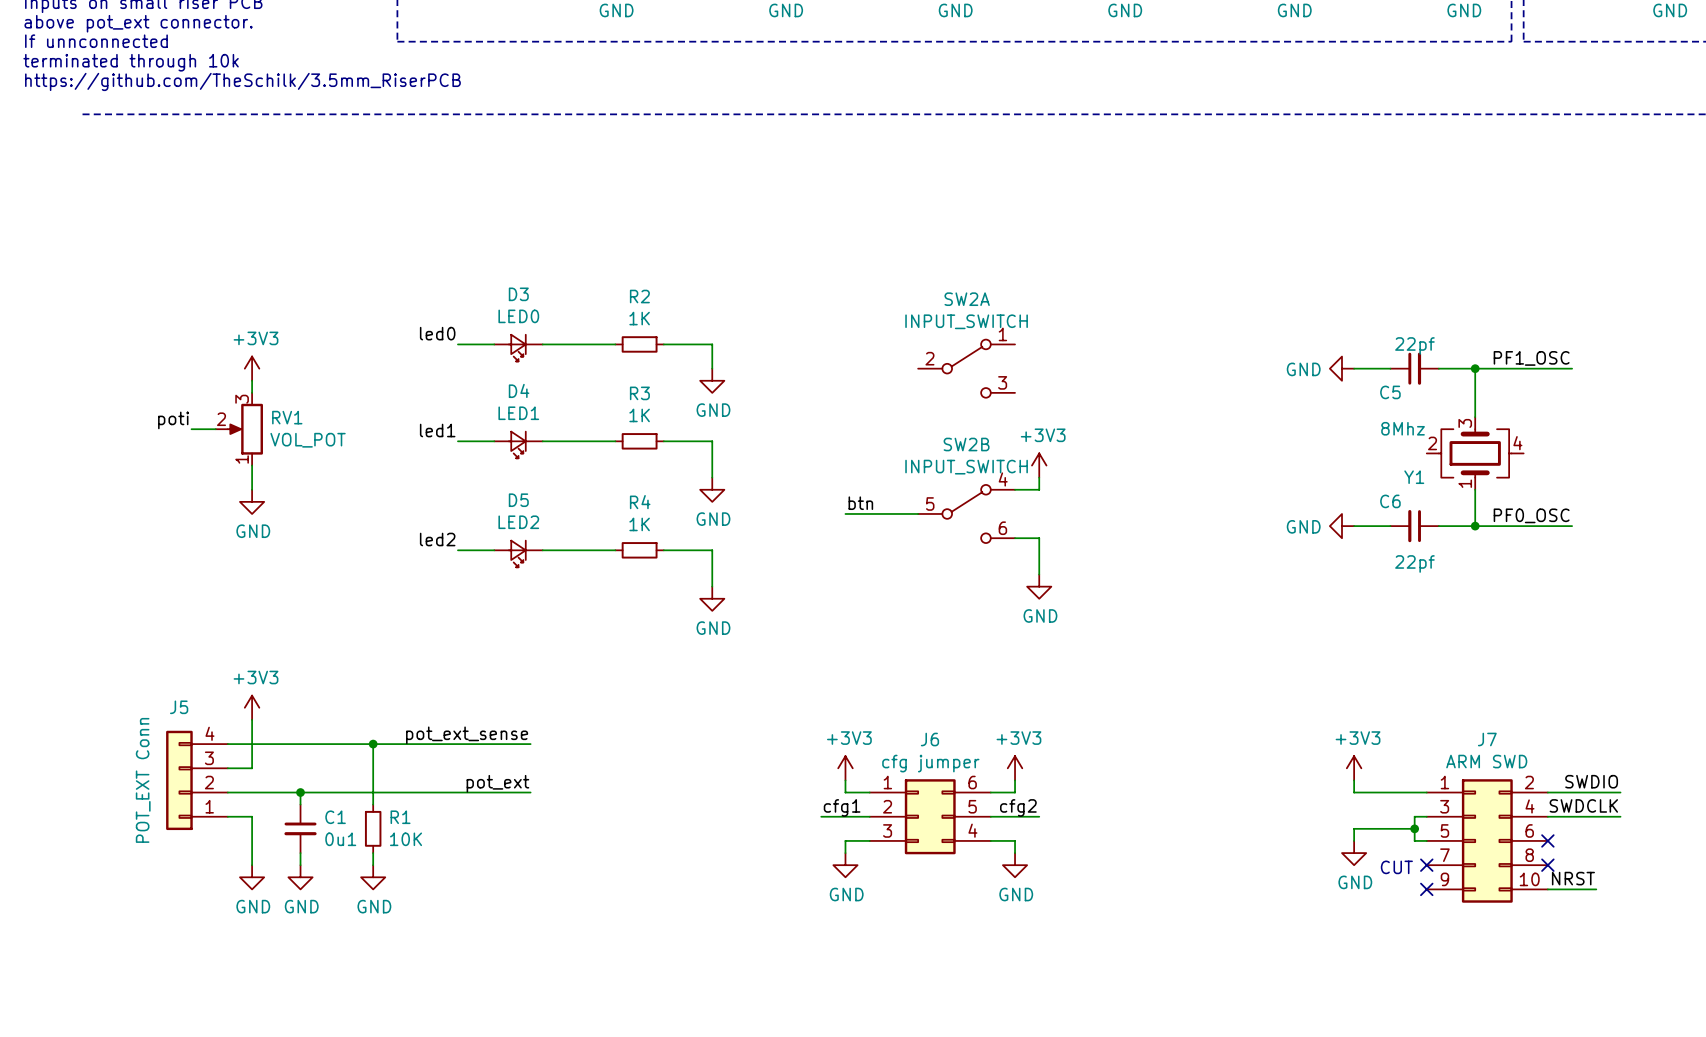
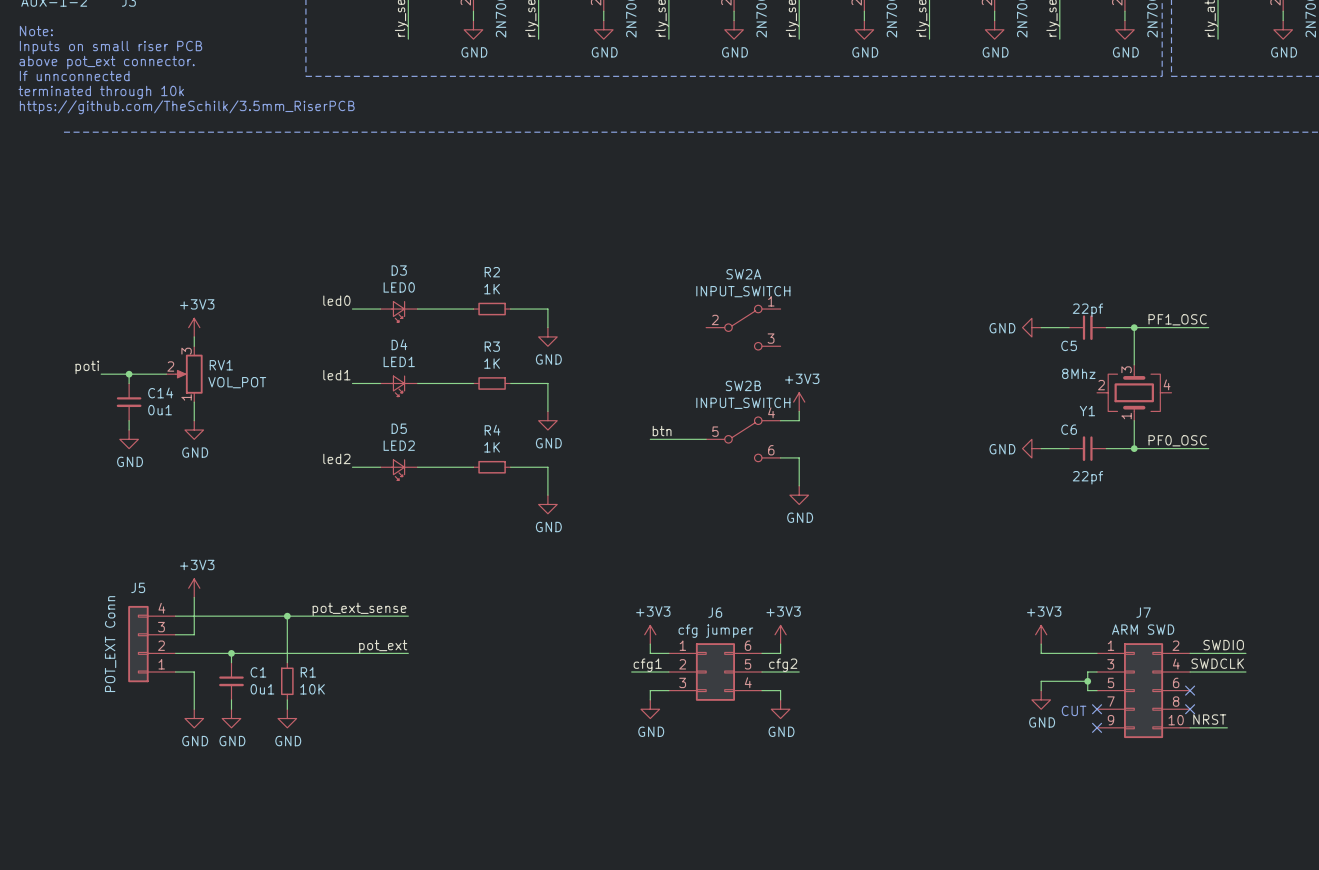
label position: poti (173, 420) -> poti (87, 367)
wire: none -> (101, 374) (147, 374)
wire: none -> (129, 374) (129, 383)
junction: none -> (129, 374)
C14: none -> 0u1 (129, 402)
wire: none -> (129, 420) (129, 430)
power symbol: none -> GND (129, 439)

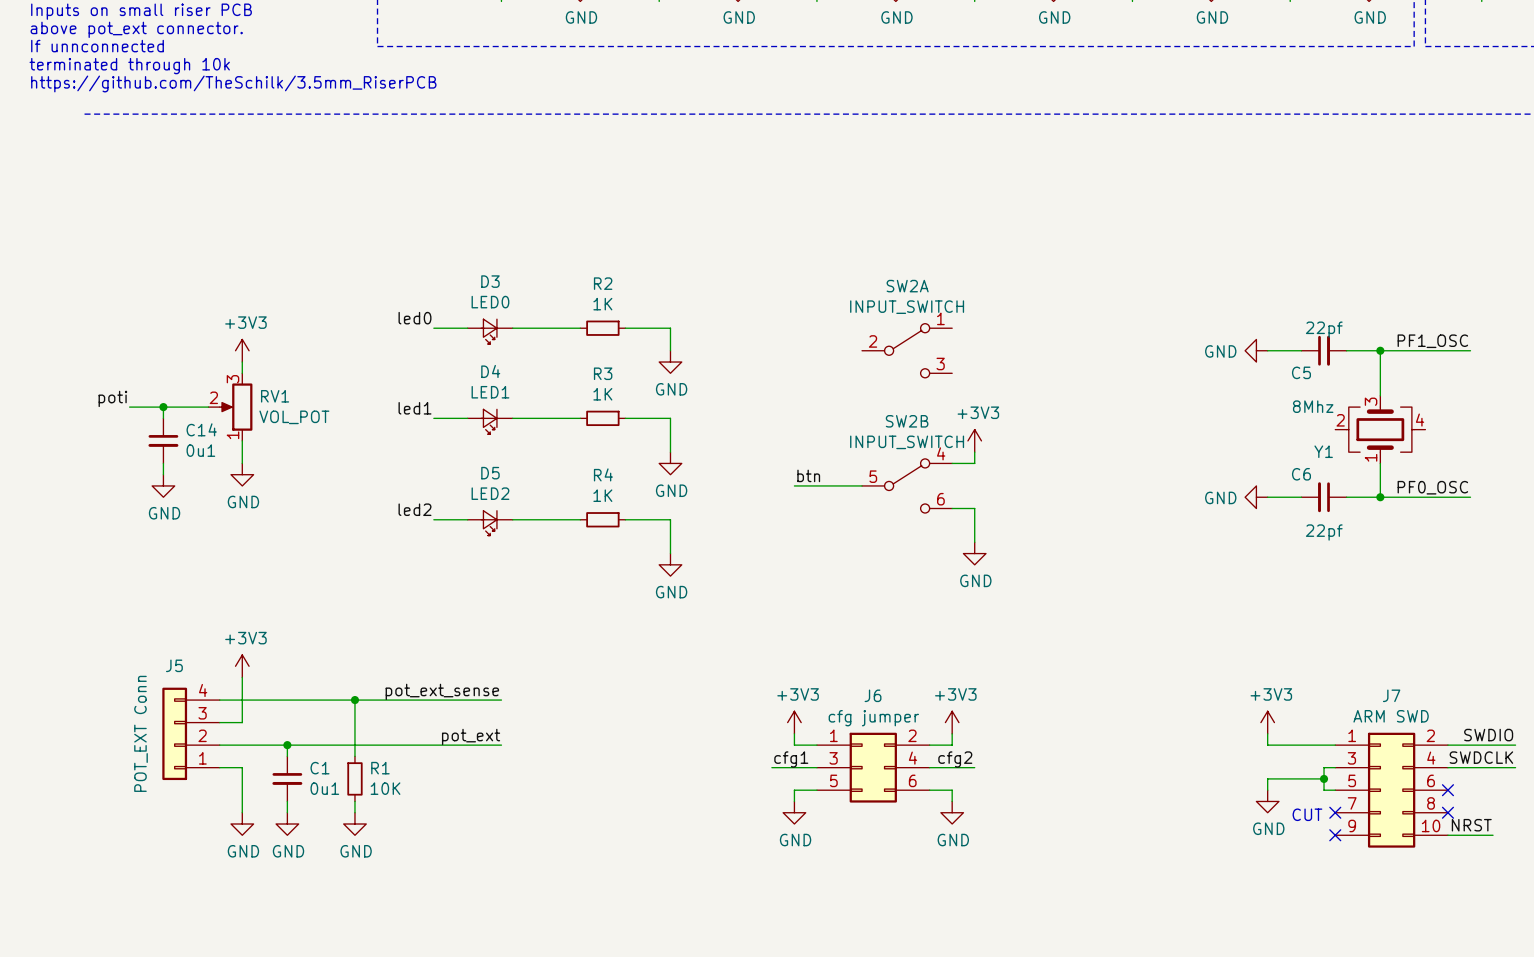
J6 pin number: 6 (748, 645) -> 2 (912, 735)
J6 pin number: 2 (682, 664) -> 3 (833, 758)
J6 pin number: 5 (748, 664) -> 4 (913, 758)
J6 pin number: 3 (682, 682) -> 5 (833, 780)
J6 pin number: 4 (748, 682) -> 6 (912, 780)

